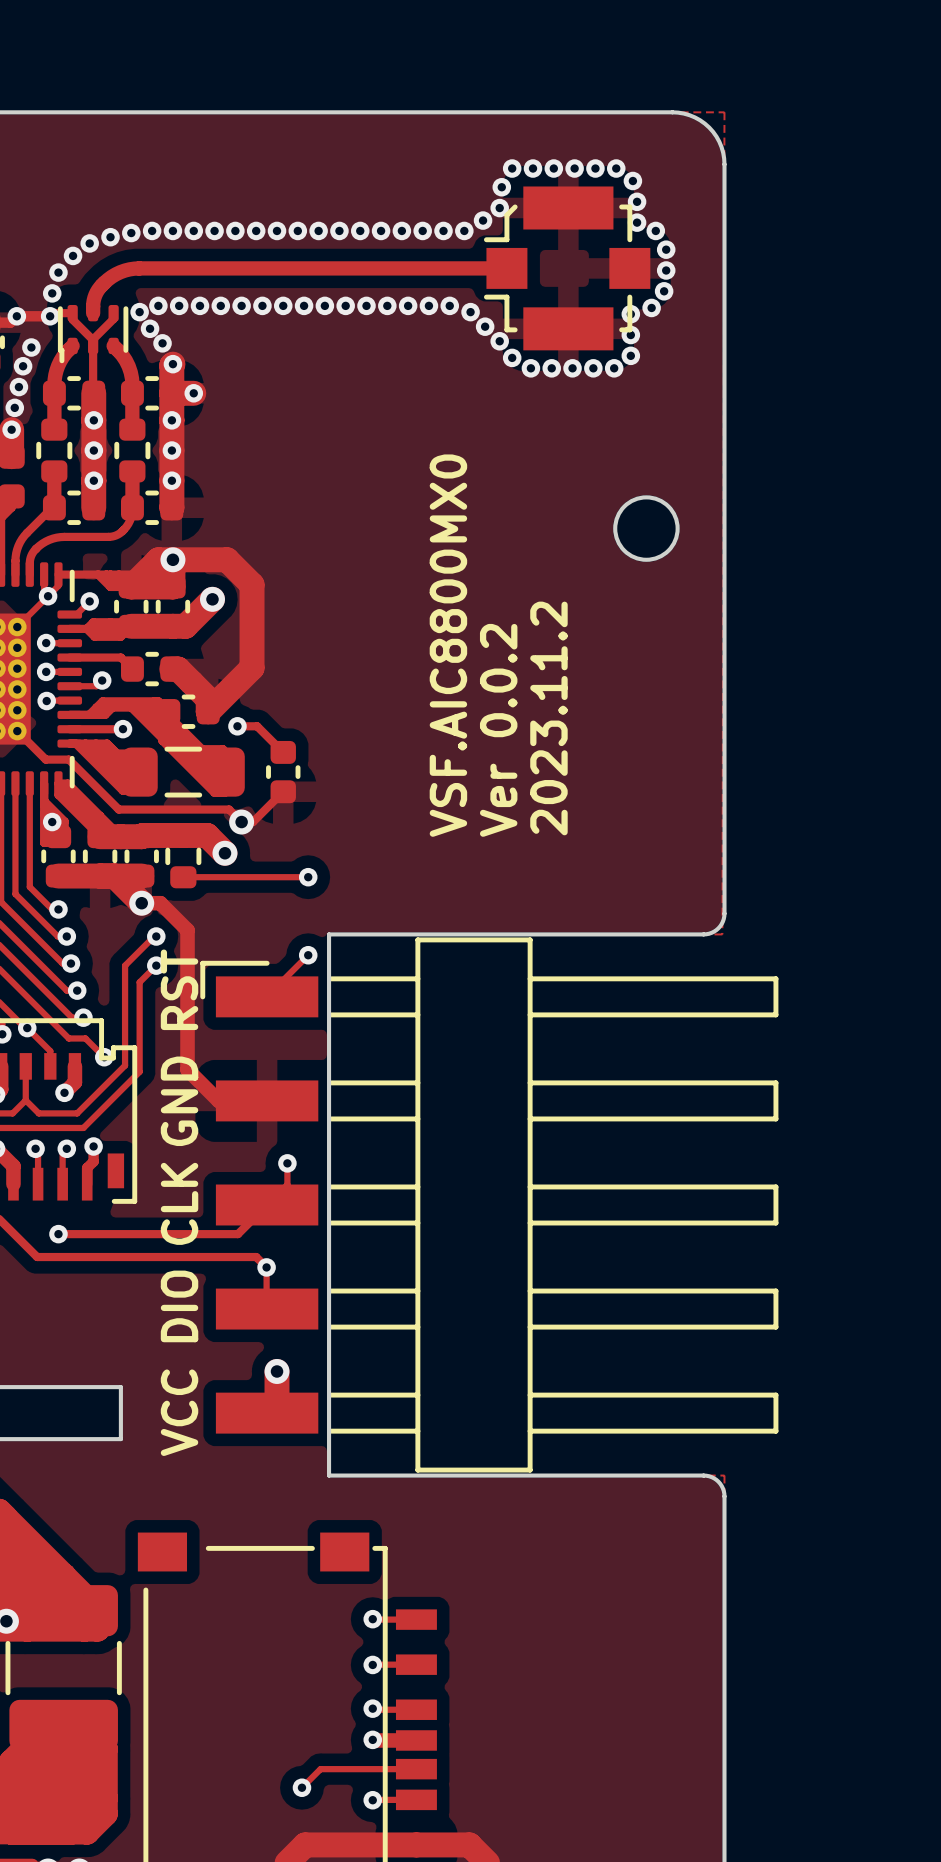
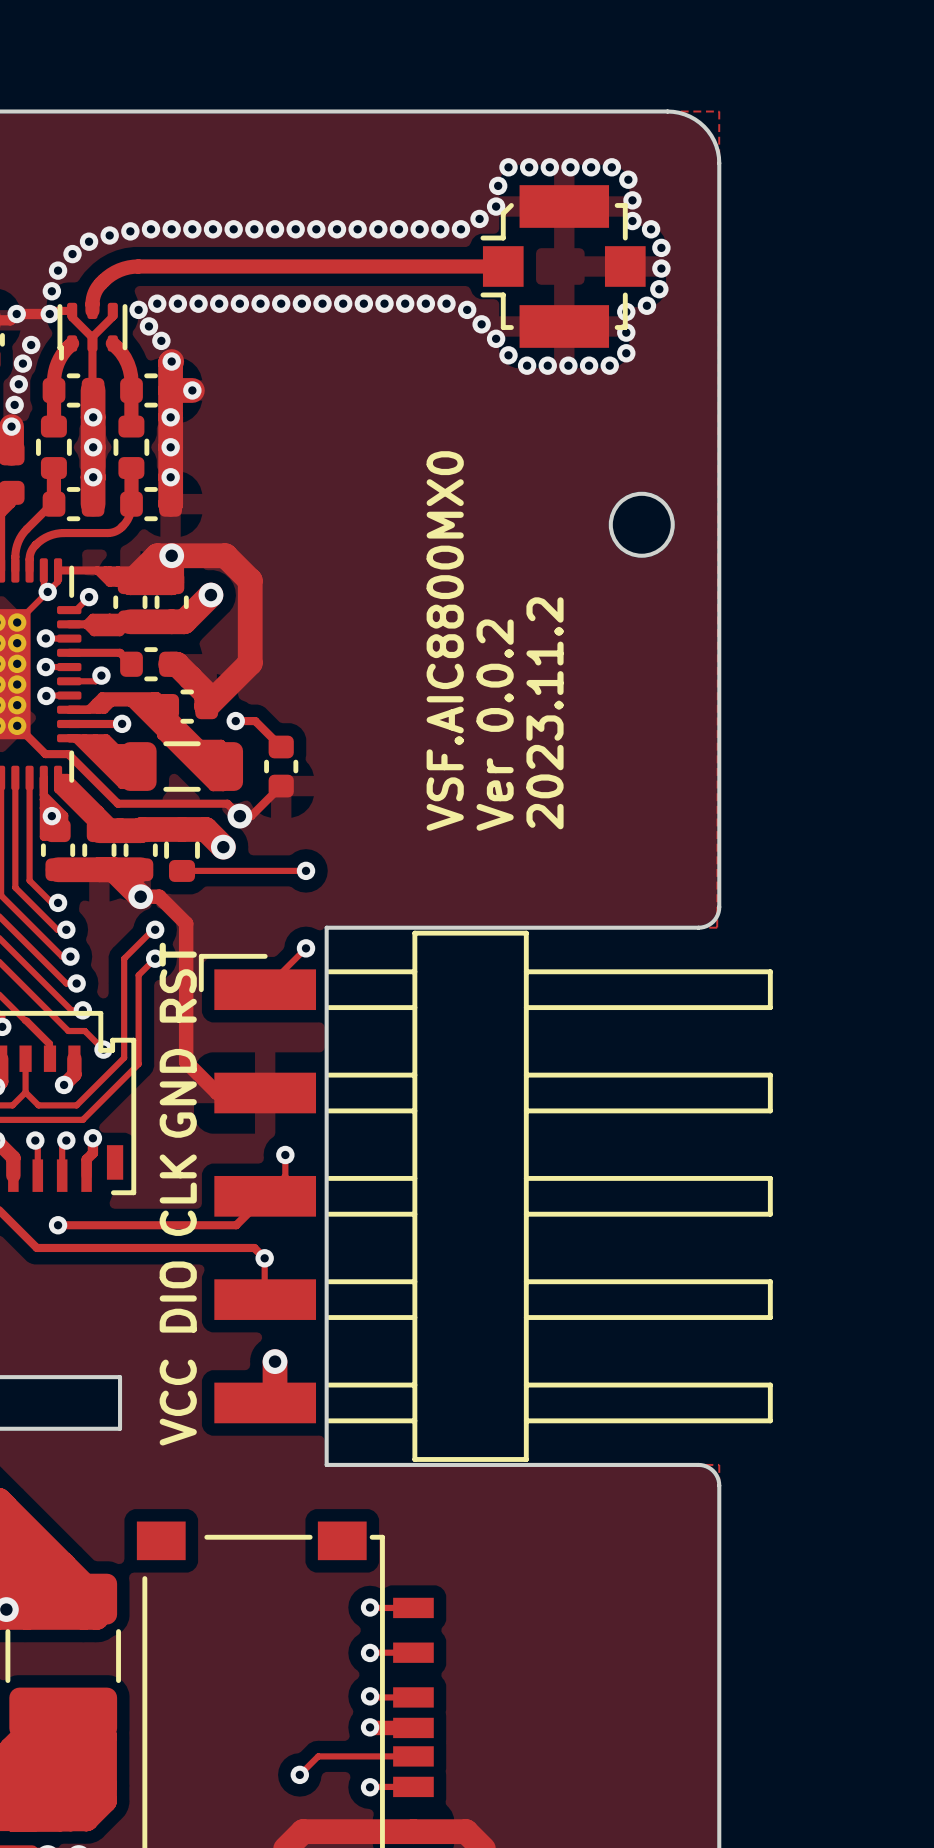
via: (27, 1028) -> none

